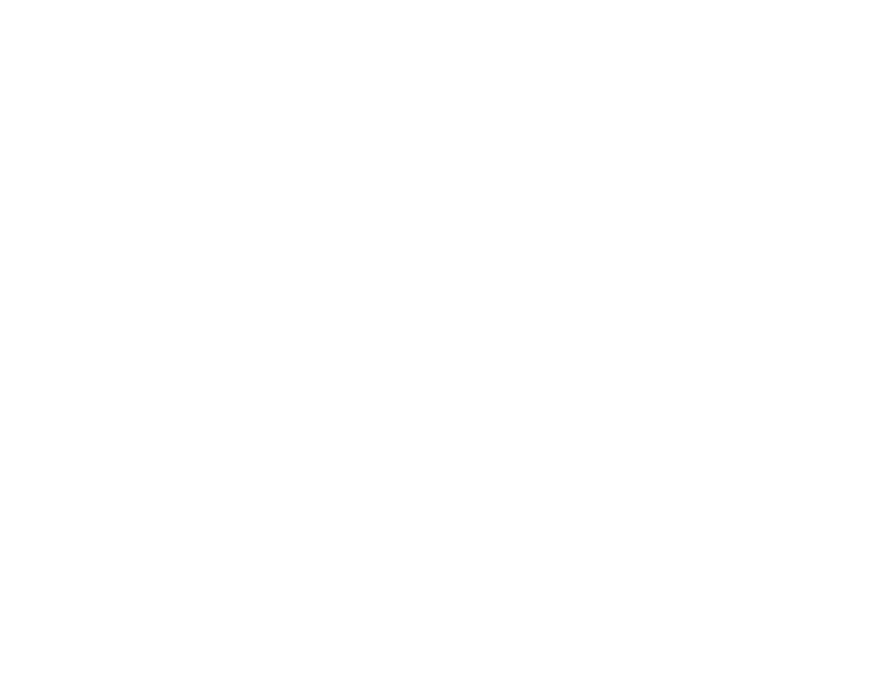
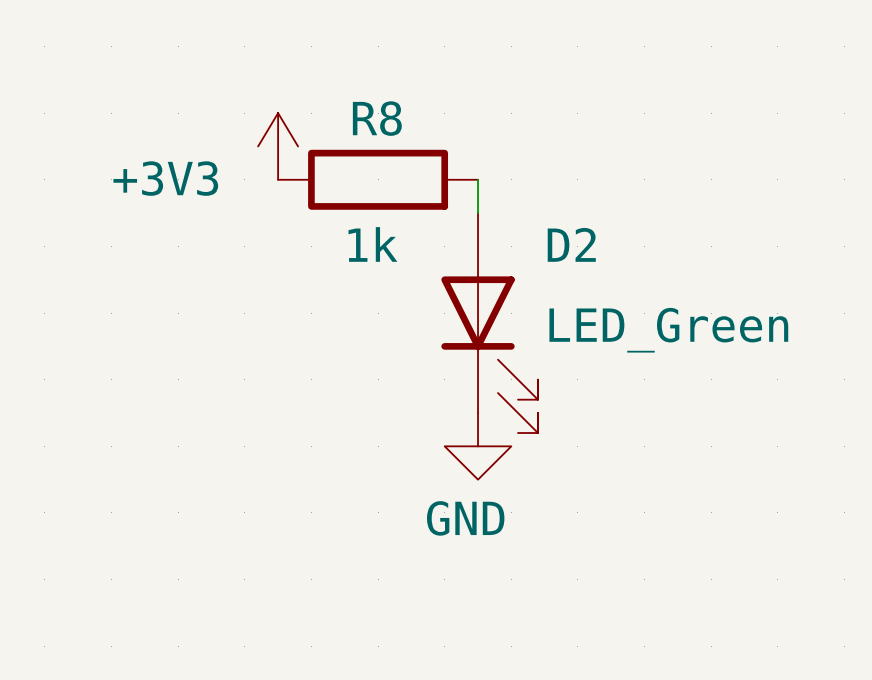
power symbol: none -> +3V3 (278, 146)
R8: none -> 1k (378, 179)
wire: none -> (478, 179) (478, 213)
D2: none -> LED_Green (489, 323)
power symbol: none -> GND (478, 446)

